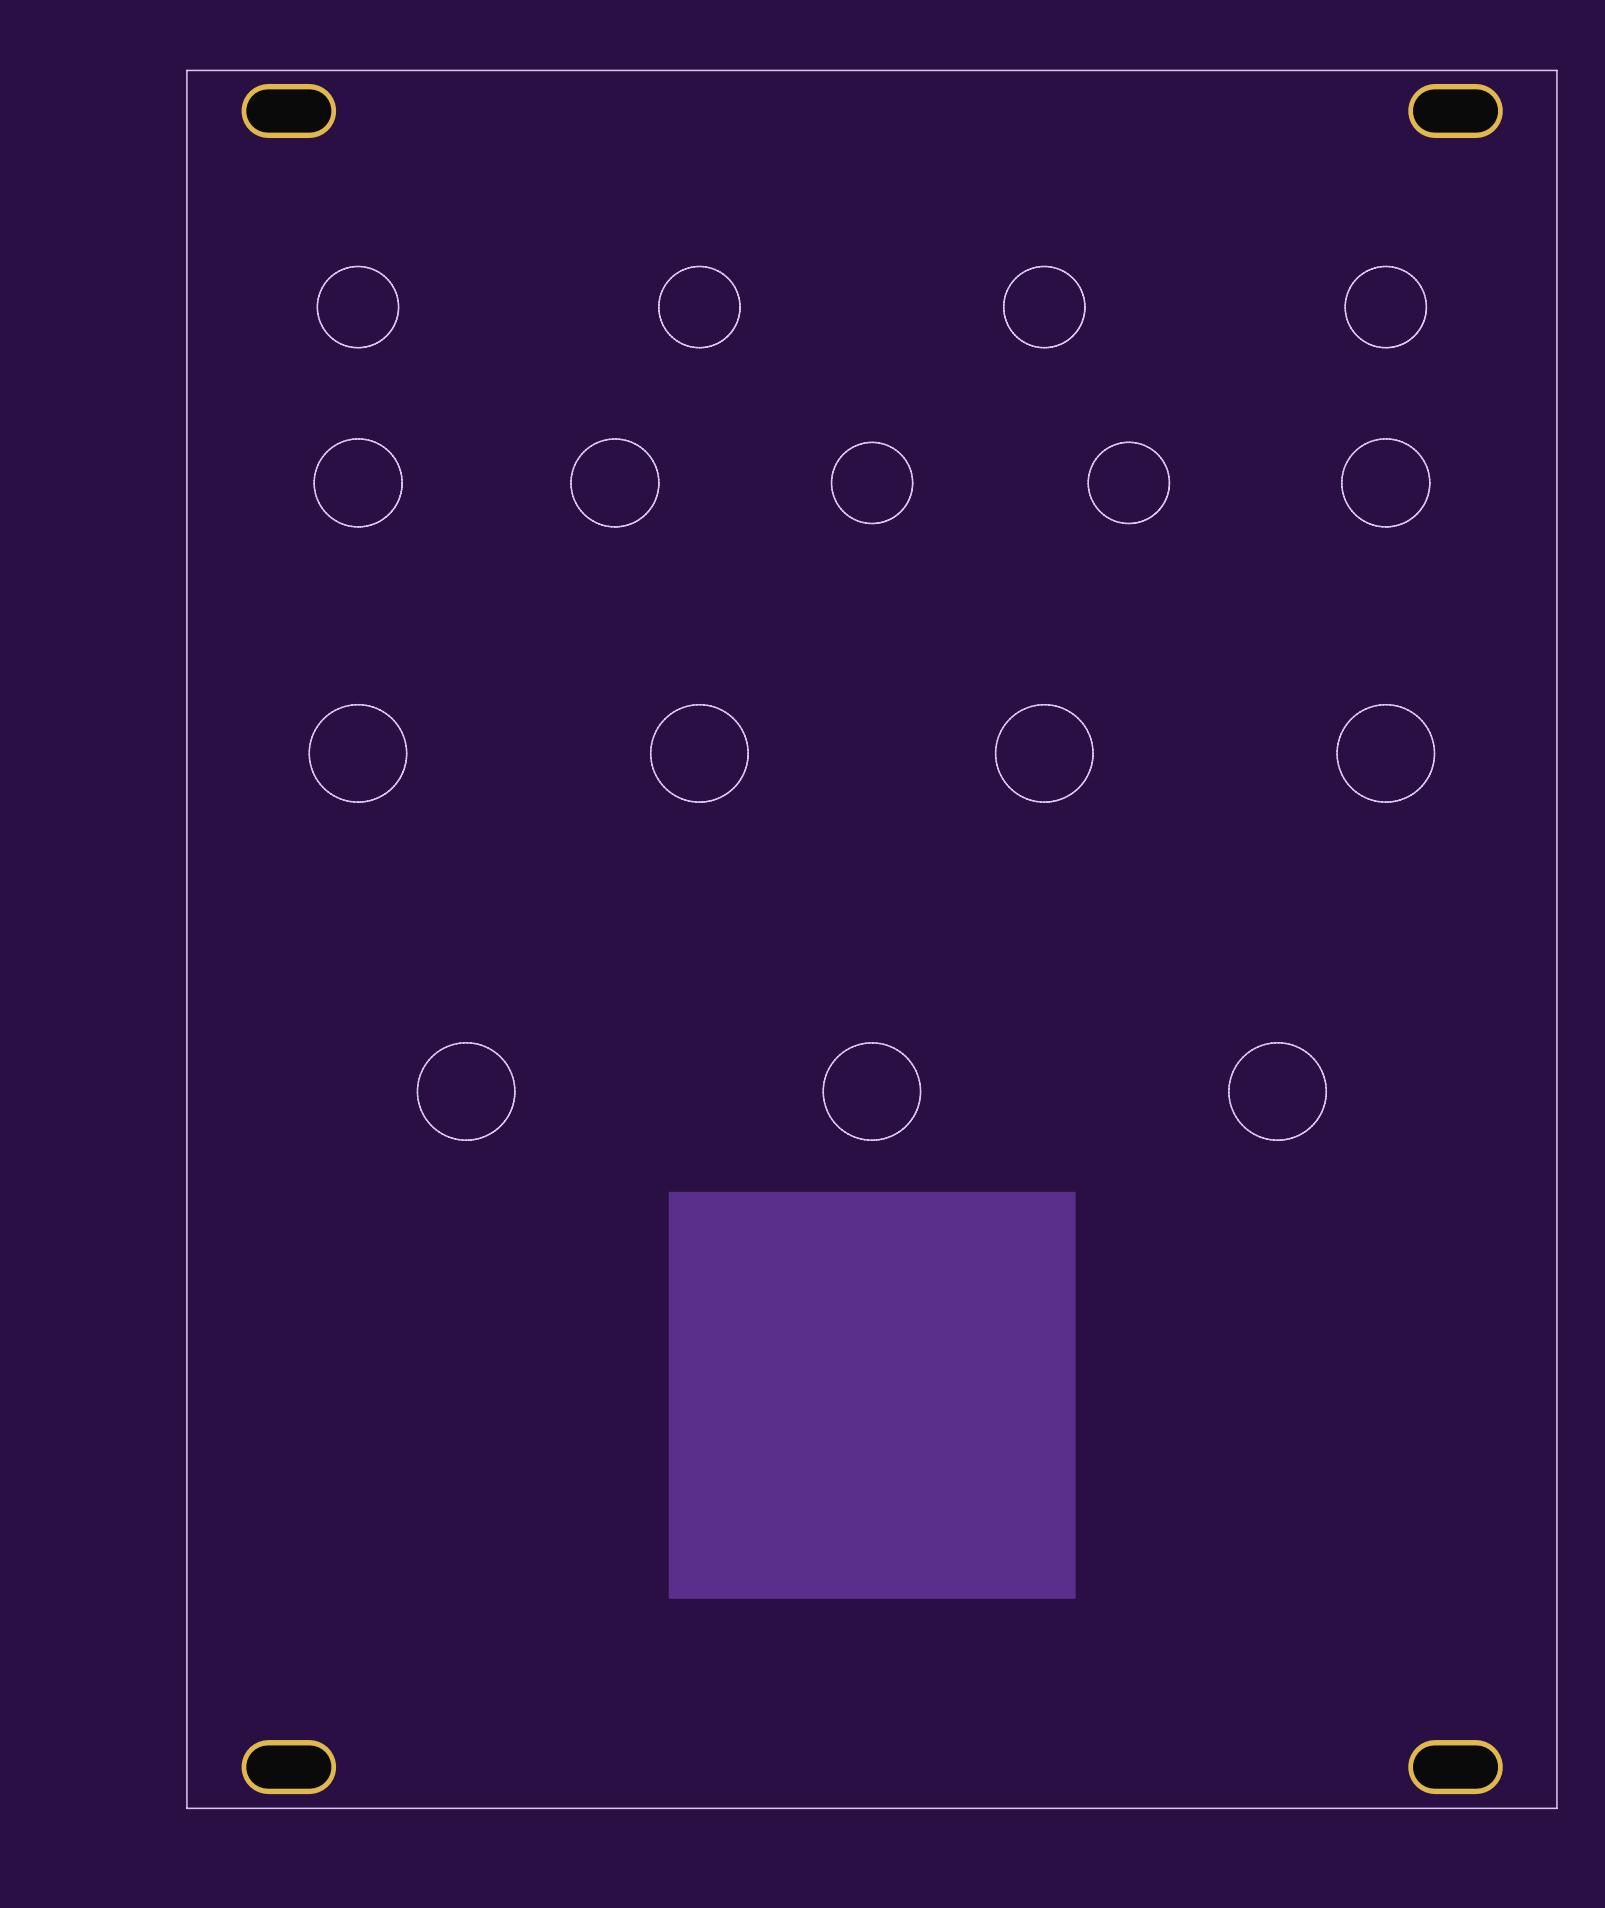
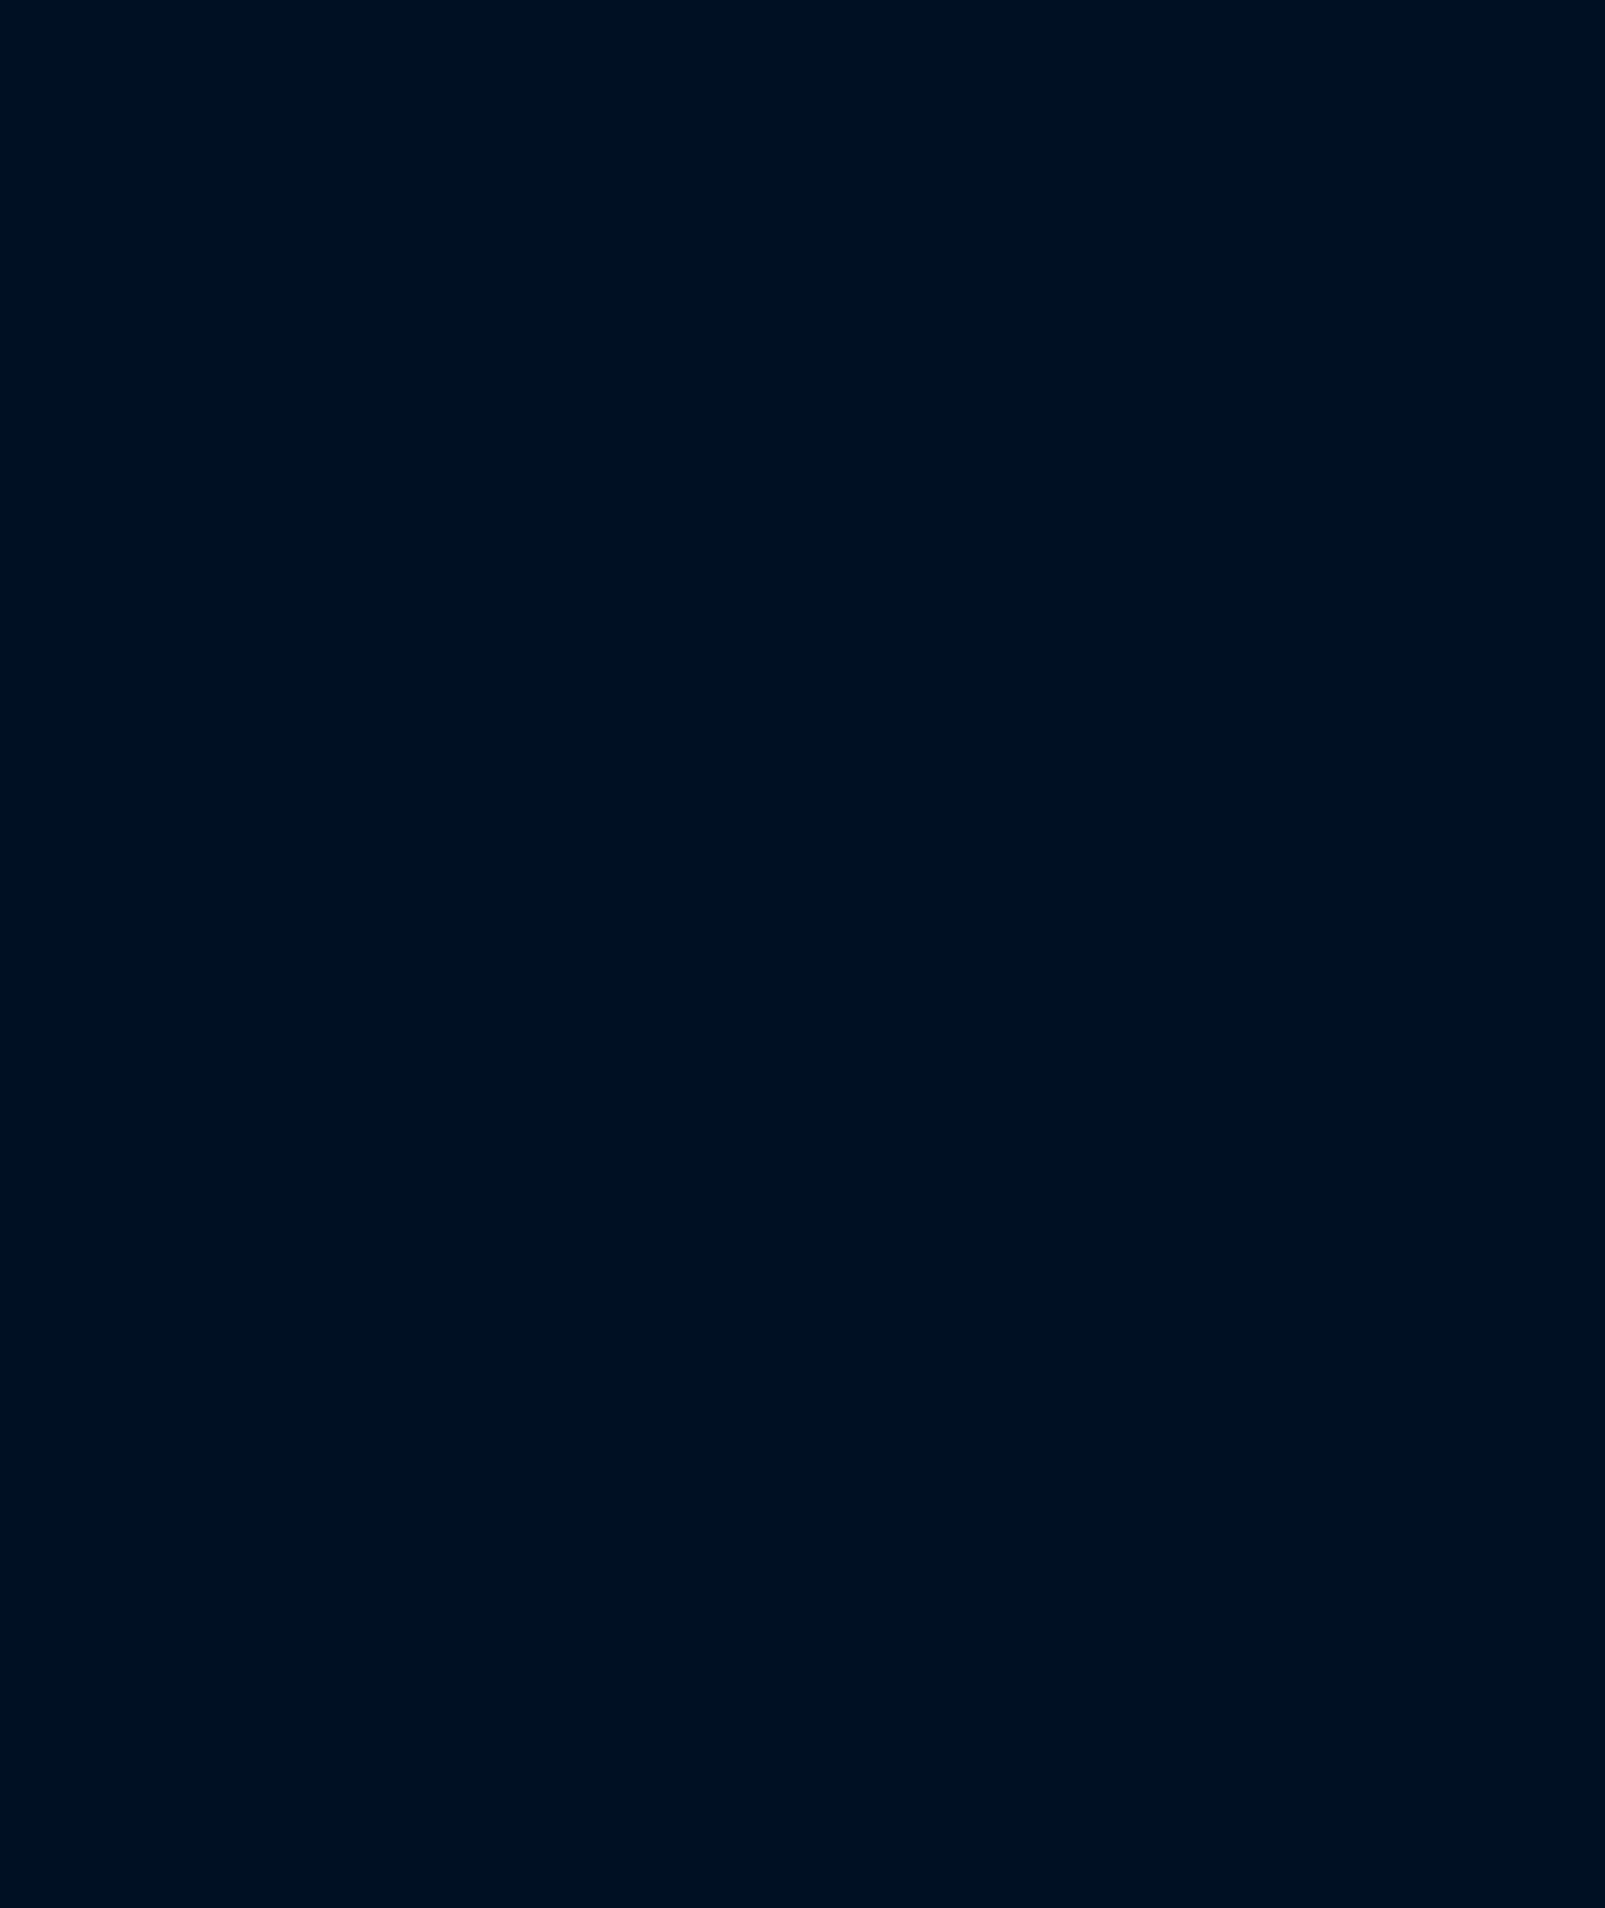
drawing: [186, 69, 1558, 1810] -> none
part: (288, 110) -> none
part: (1455, 110) -> none
part: (288, 1767) -> none
part: (1455, 1767) -> none

